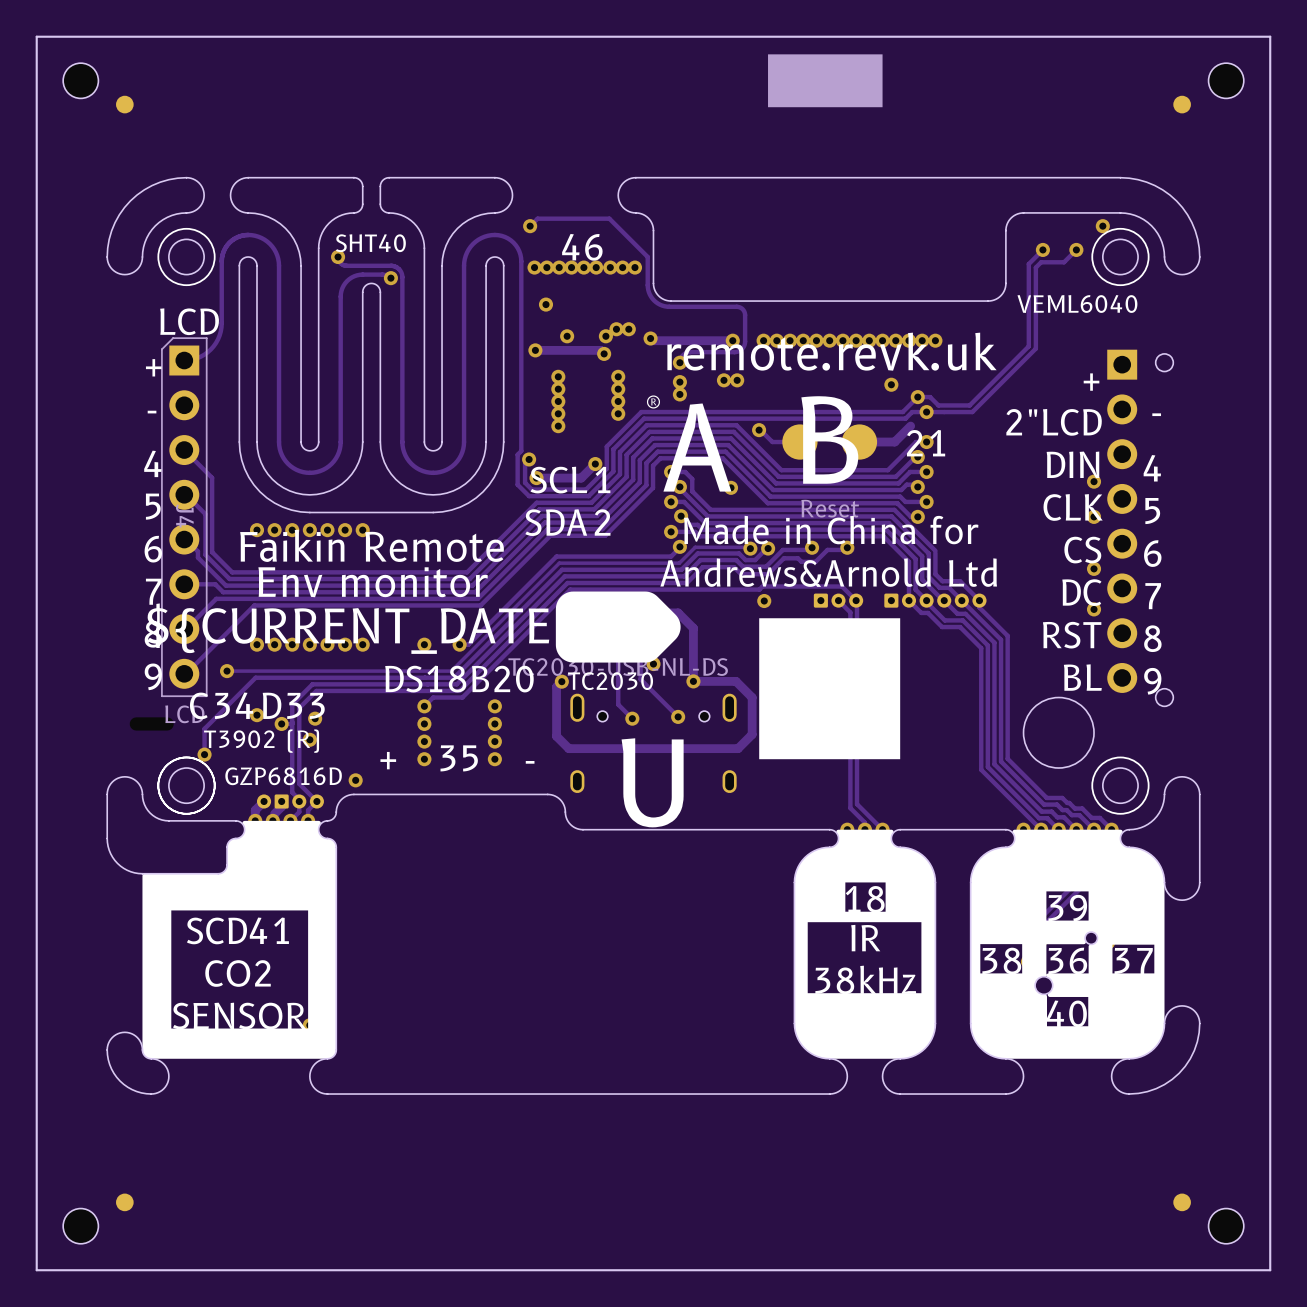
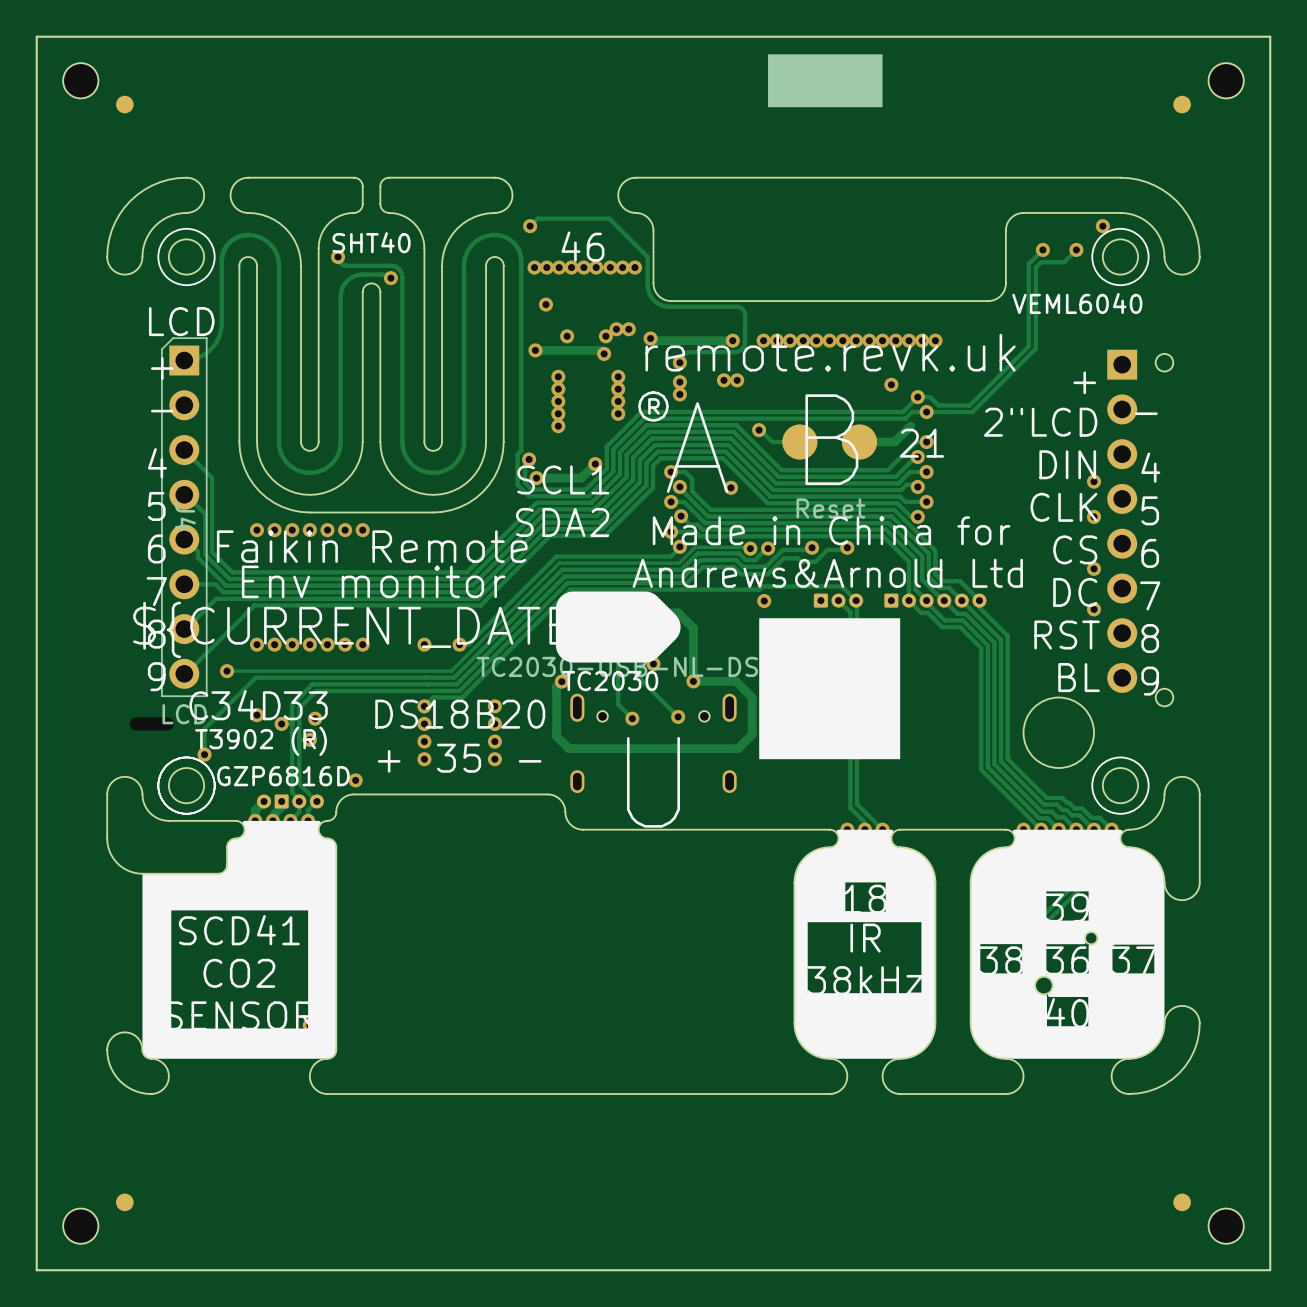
text position: DS18B20 (459, 679) -> DS18B20 (460, 714)

